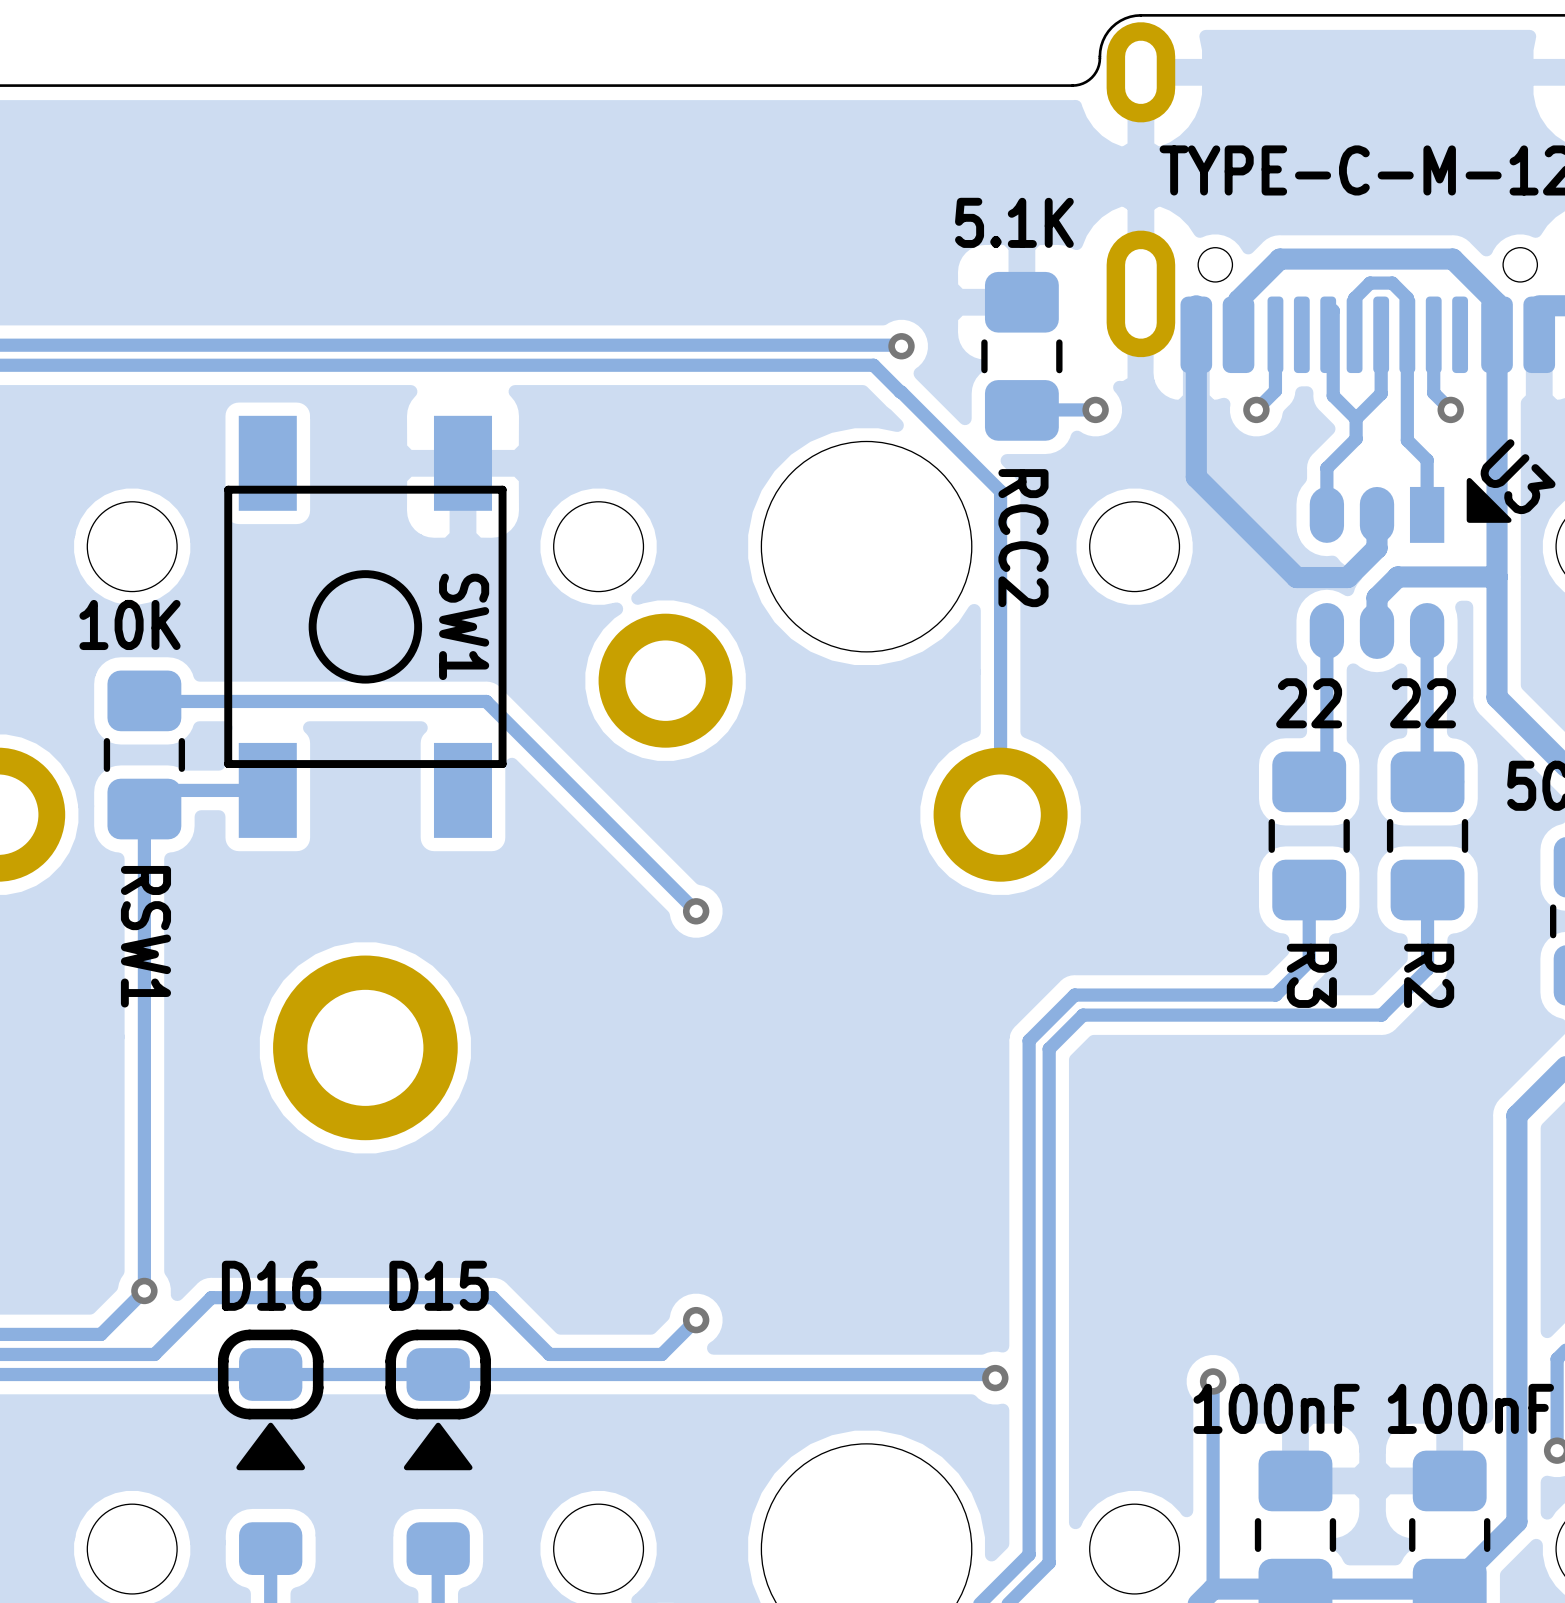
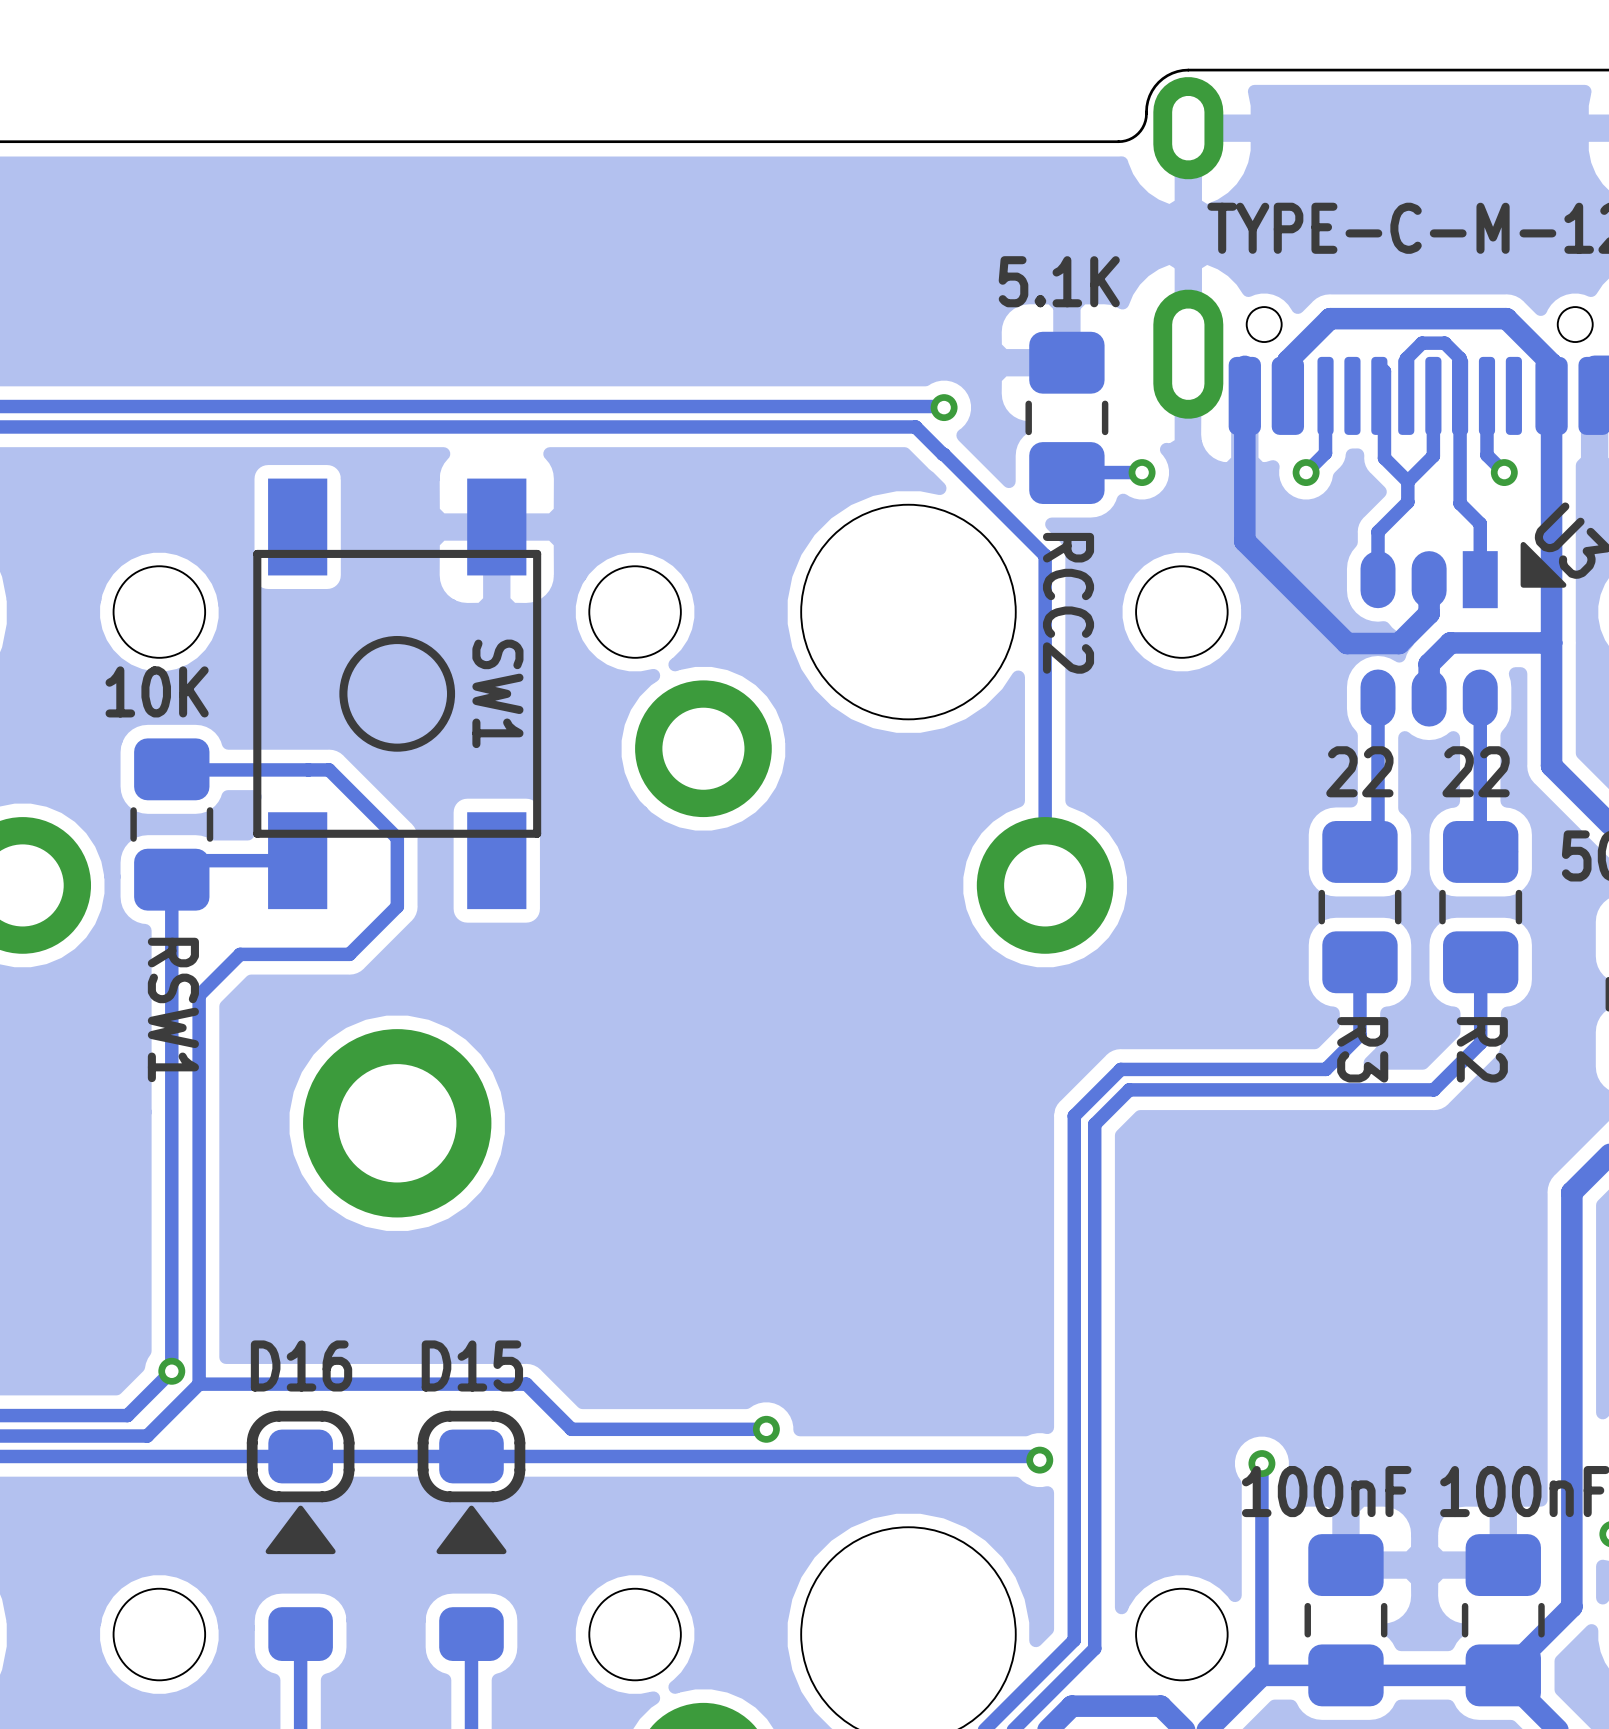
track: (298, 701) (486, 701) (696, 911) -> (329, 769) (397, 838) (397, 906) (349, 954) (240, 954) (199, 995) (199, 1384)
via: (696, 911) -> none
track: none -> (199, 1384) (526, 1384) (571, 1429) (766, 1429)
track: (696, 1320) (661, 1354) (549, 1354) (492, 1297) (211, 1297) (154, 1354) (120, 1354) -> (199, 1384) (147, 1436)
via position: (696, 1320) -> (766, 1429)

